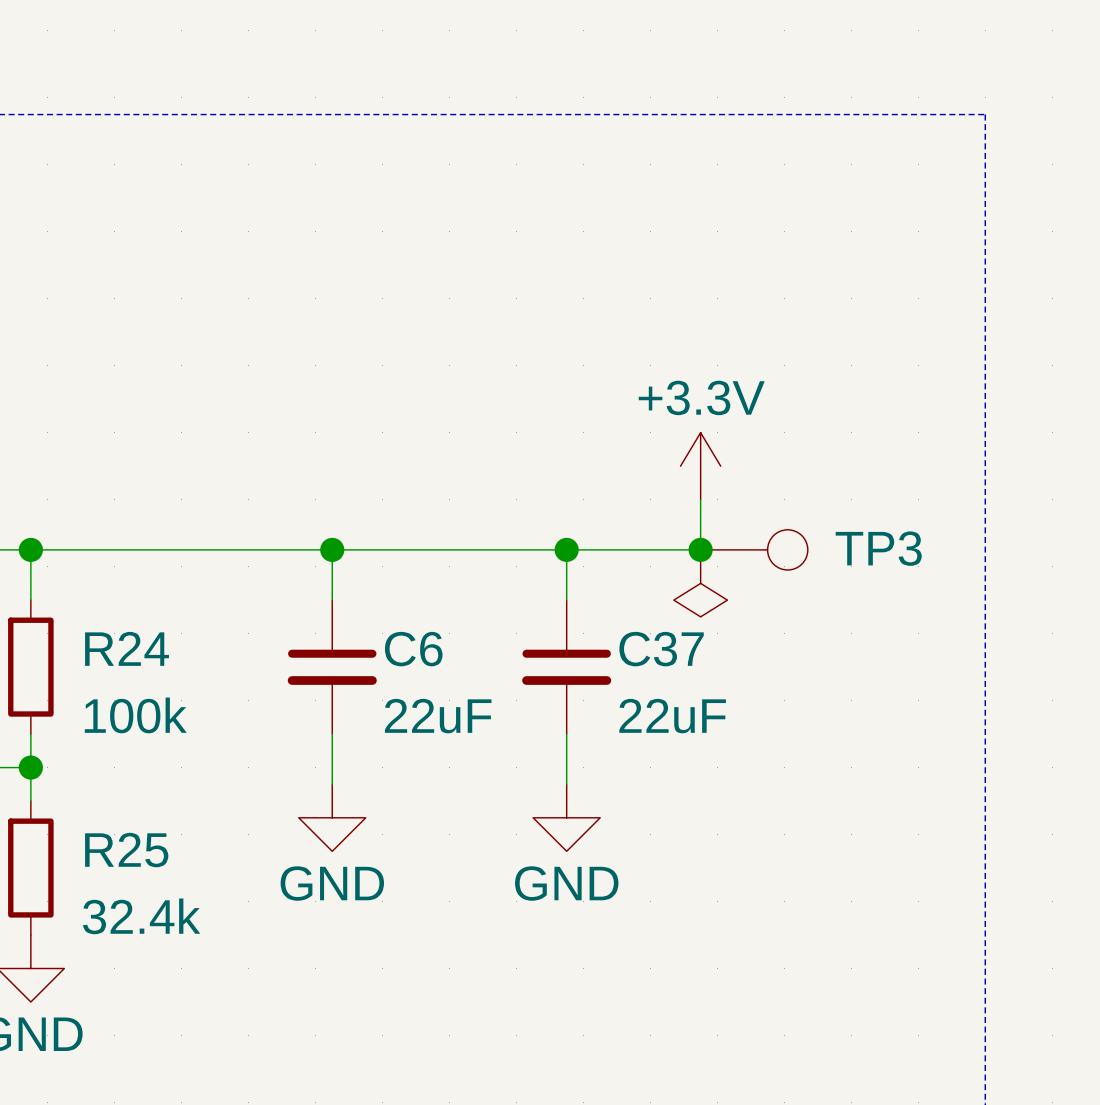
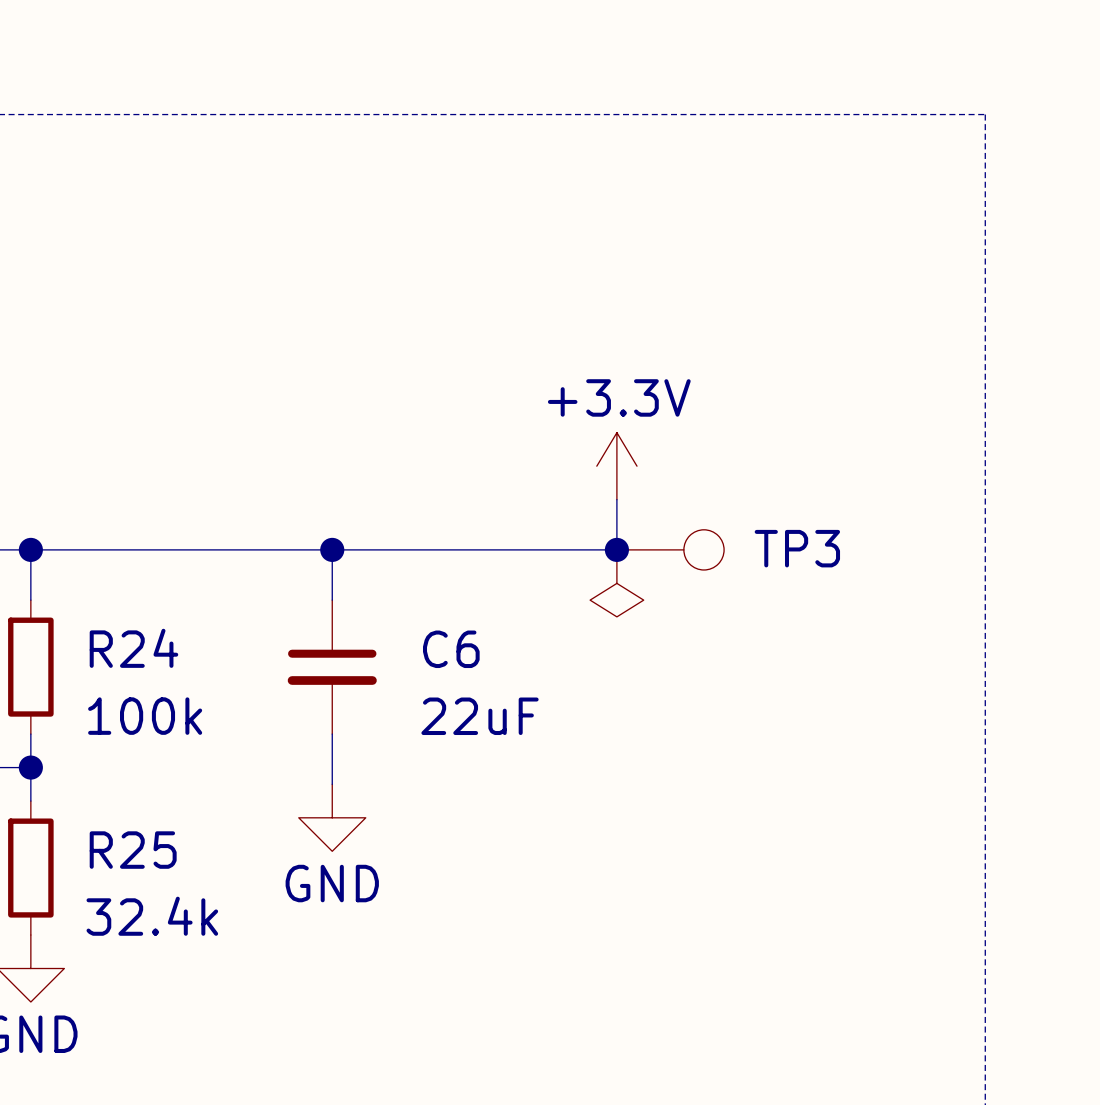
power symbol position: +3.3V (700, 466) -> +3.3V (616, 466)
wire: (700, 499) (700, 549) (616, 549) -> (616, 499) (616, 549)
wire: (566, 549) (566, 600) -> none
junction: (566, 549) -> none
junction: none -> (616, 549)
junction: (700, 549) -> none
TP3 position: (754, 549) -> (670, 549)
power symbol position: (700, 583) -> (616, 583)
C6 name position: C6 (413, 649) -> C6 (451, 649)
C37: 22uF (566, 667) -> none
C6 value position: 22uF (438, 716) -> 22uF (480, 716)
wire: (566, 734) (566, 784) -> none
power symbol: GND (566, 817) -> none

